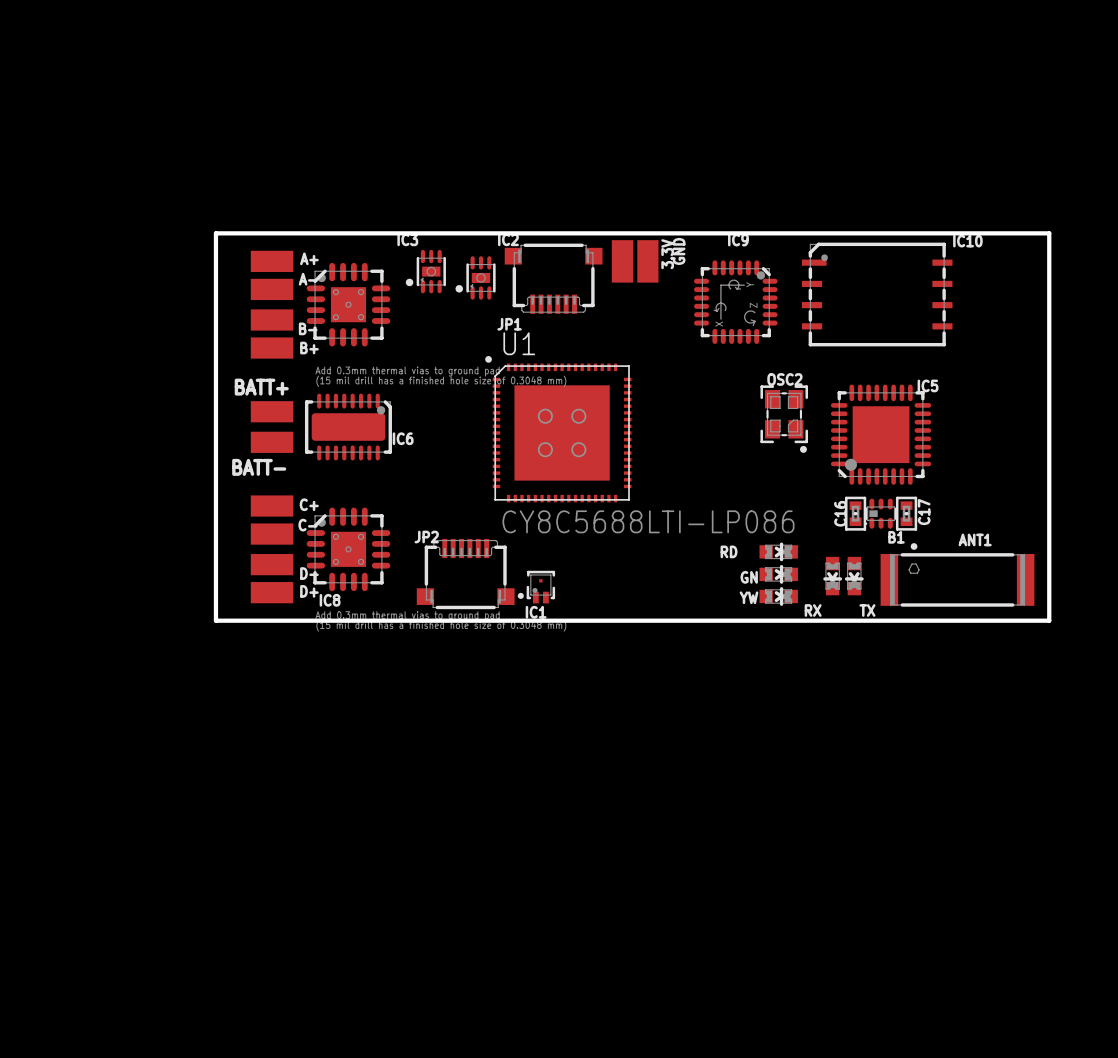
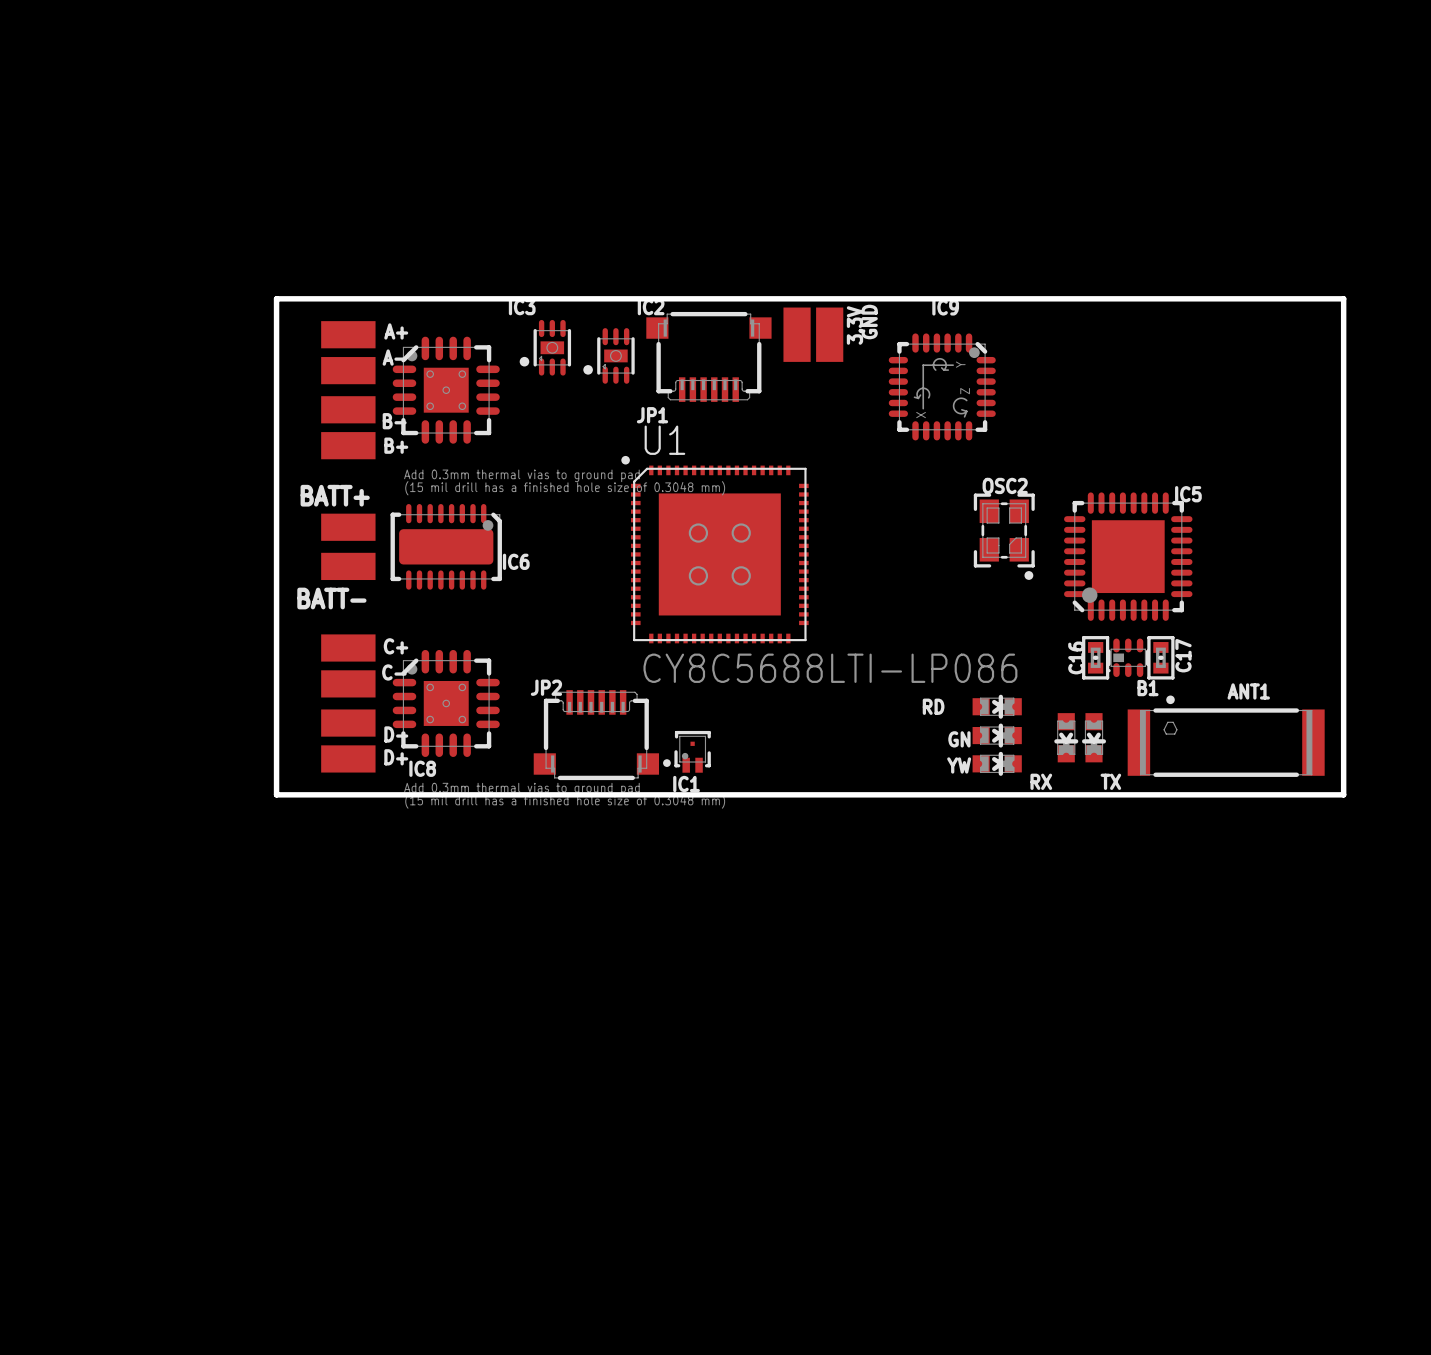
IC10: (877, 294) -> none

